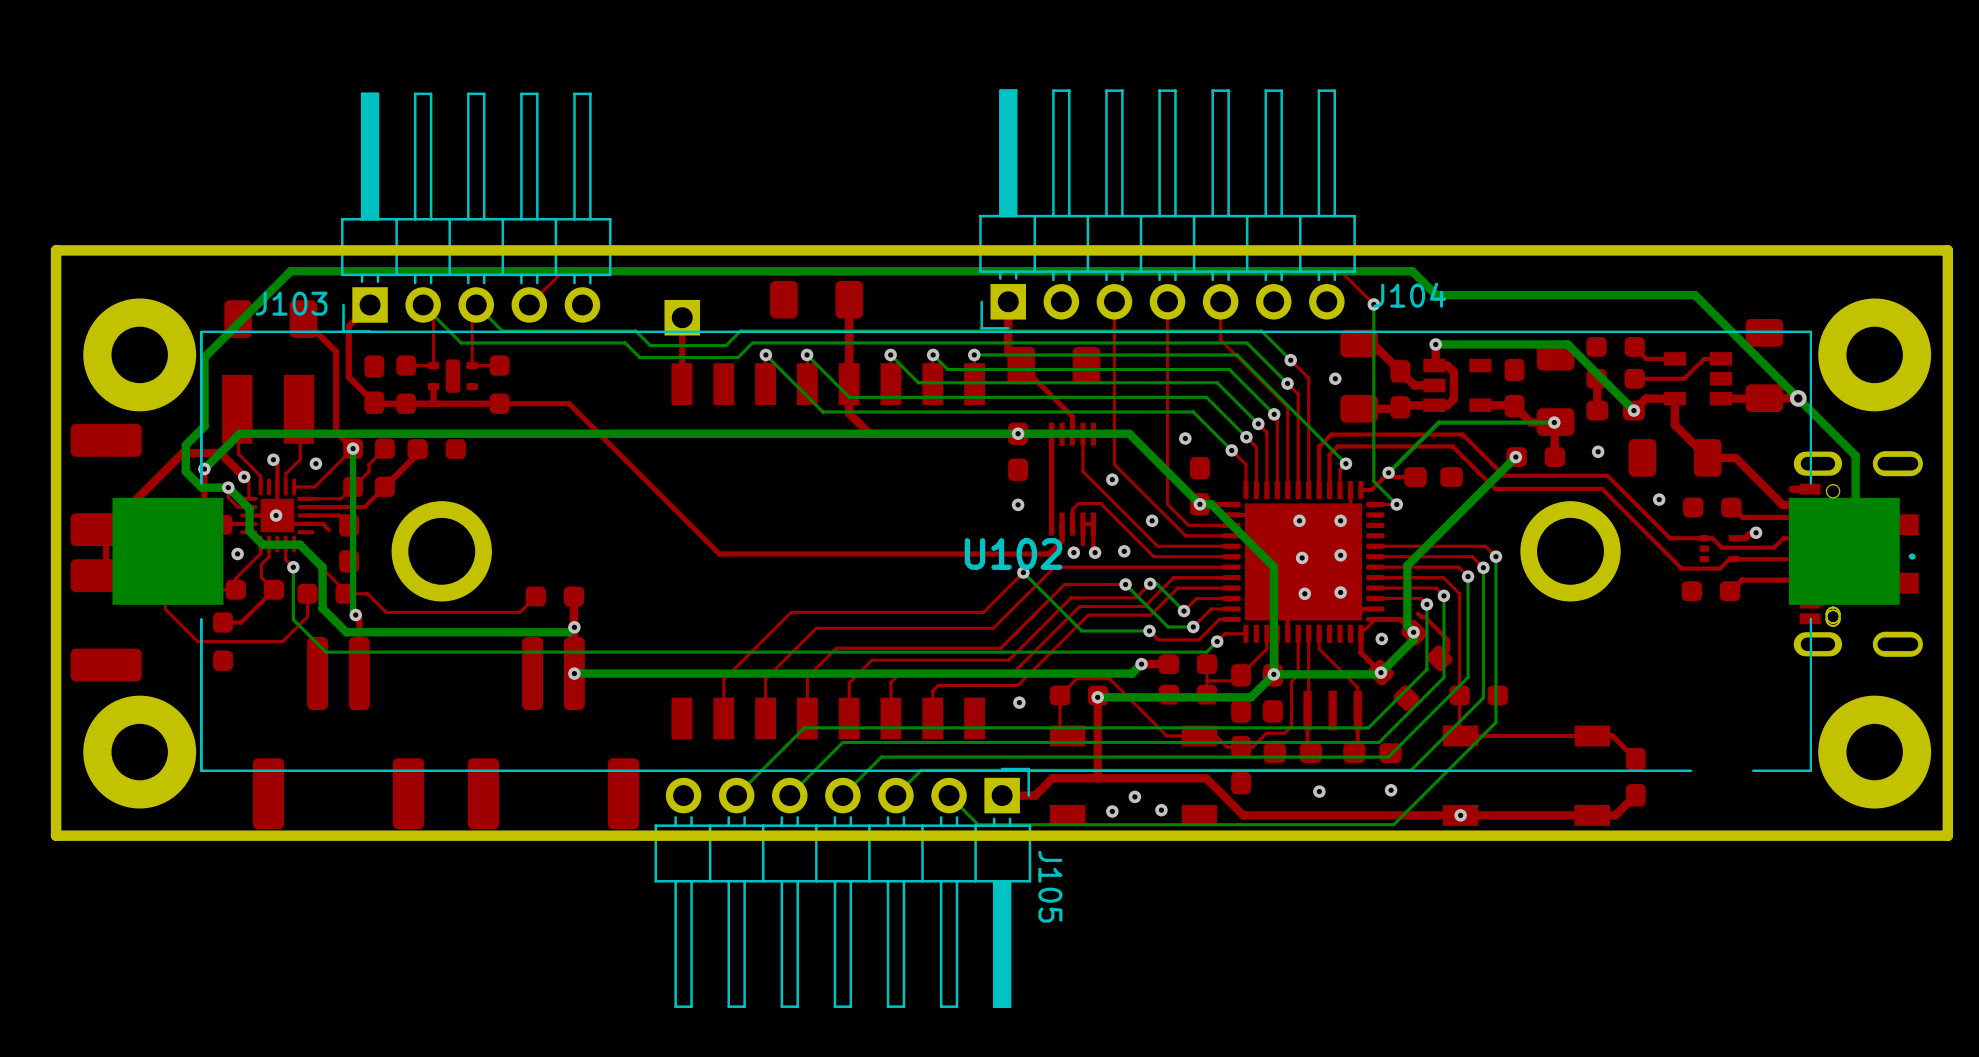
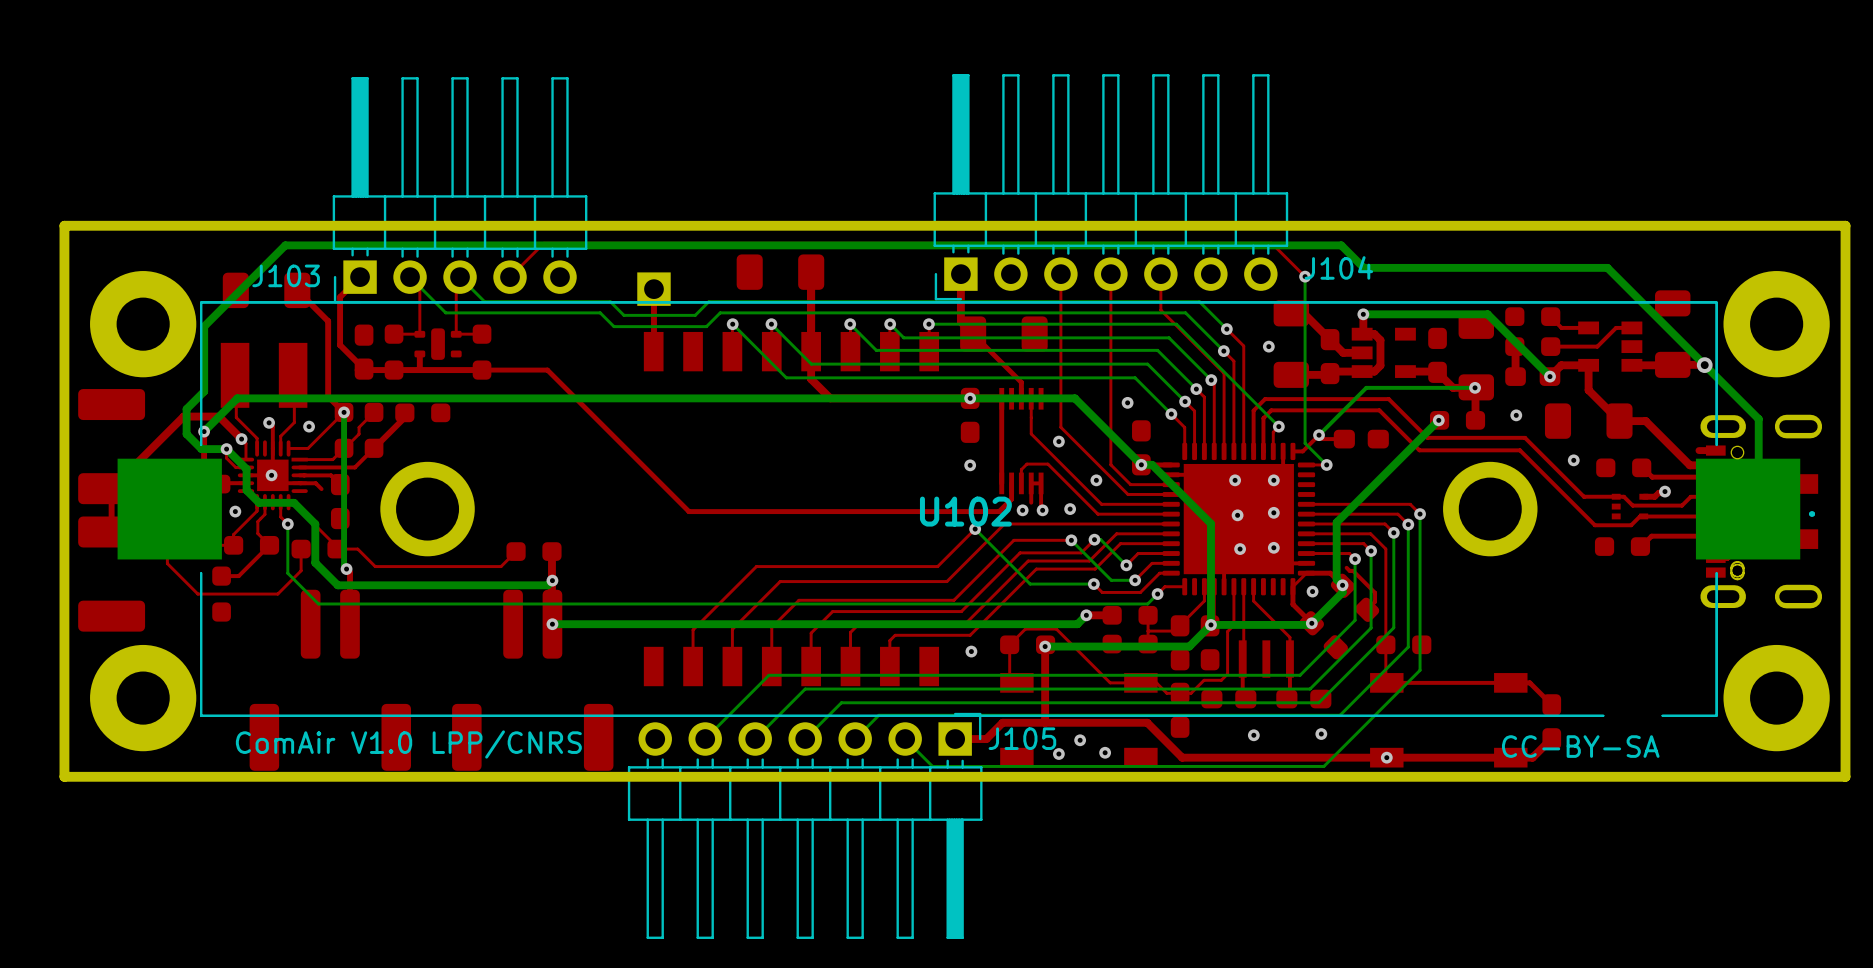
text: none -> ComAir V1.0 LPP/CNRS (408, 744)
text: none -> CC-BY-SA (1580, 746)
J105 name rotation: 0° (1050, 886) -> 90° counterclockwise (1022, 738)
J105 name position: J105 (1050, 886) -> J105 (1022, 738)

